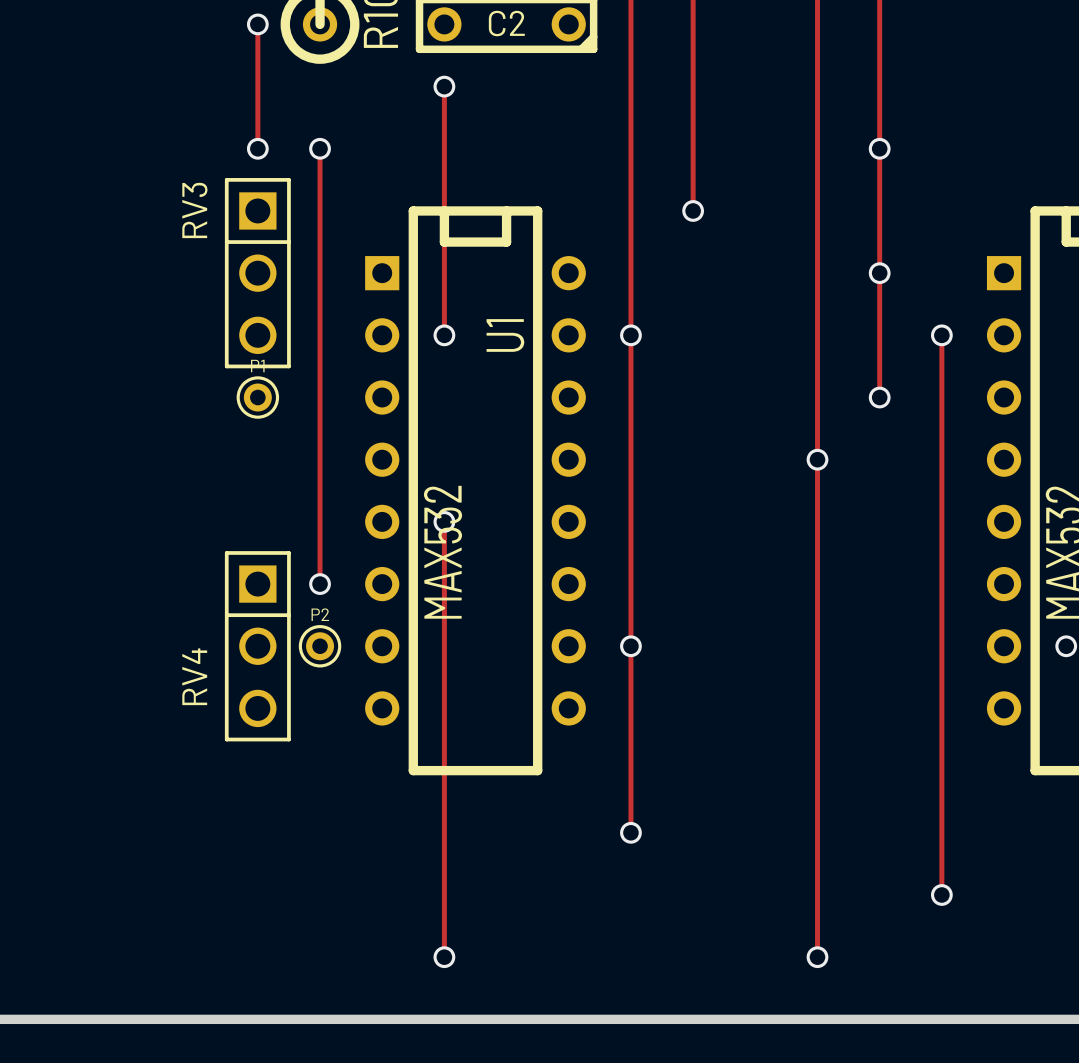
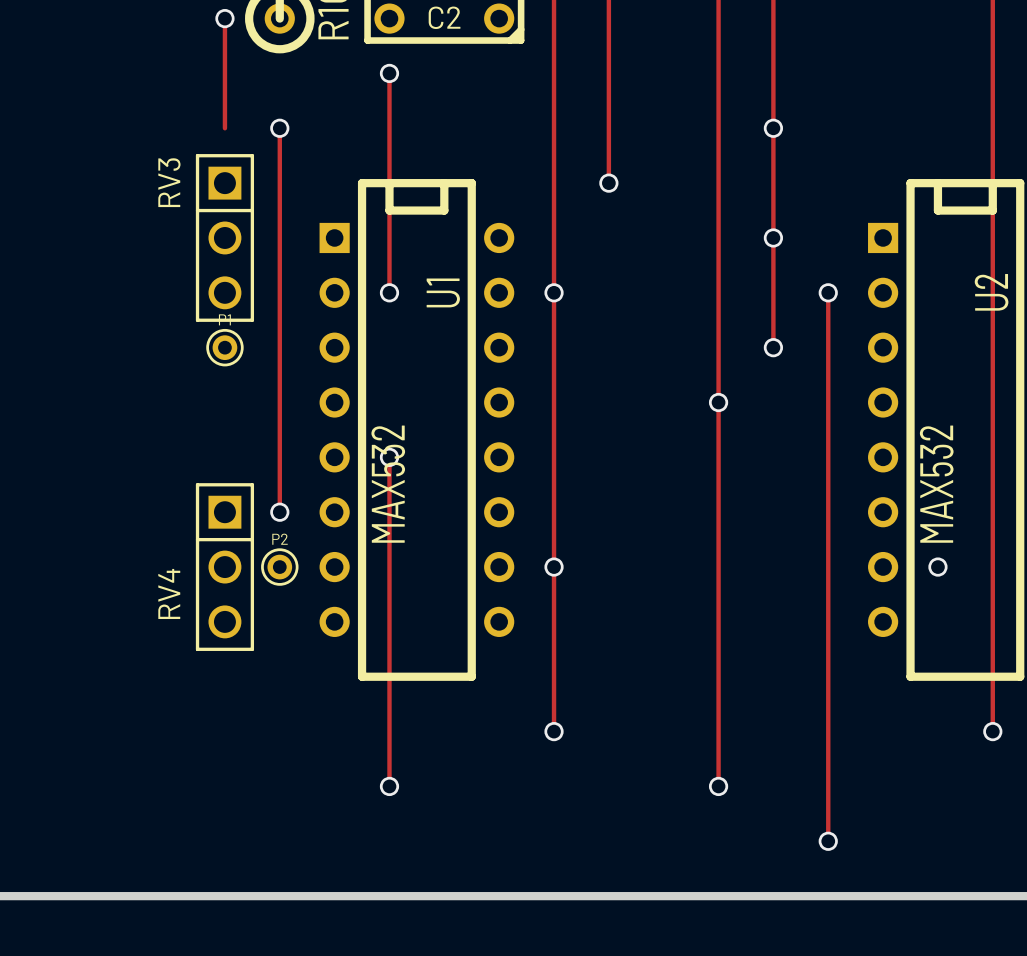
via: (257, 148) -> none
track: (444, 894) (444, 957) -> none
track: (817, 894) (817, 957) -> (828, 786) (828, 841)
via: none -> (718, 786)
via: (941, 894) -> none
via position: (444, 957) -> (389, 786)
via: (817, 957) -> none
via: none -> (828, 841)

